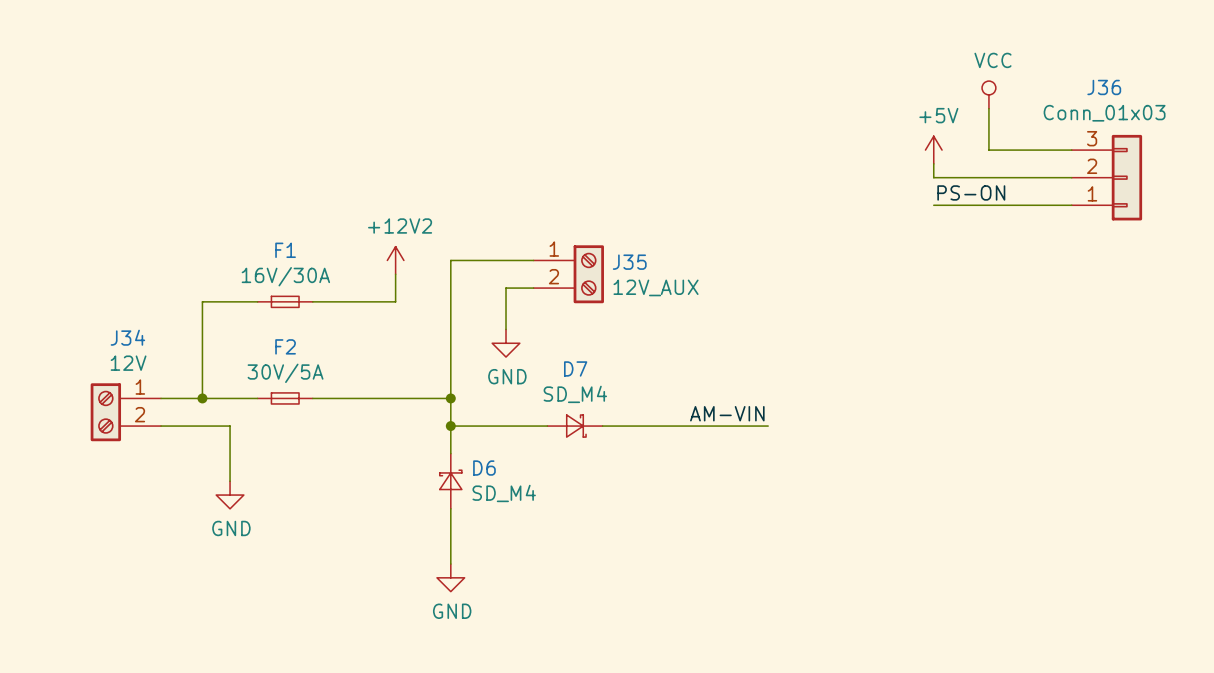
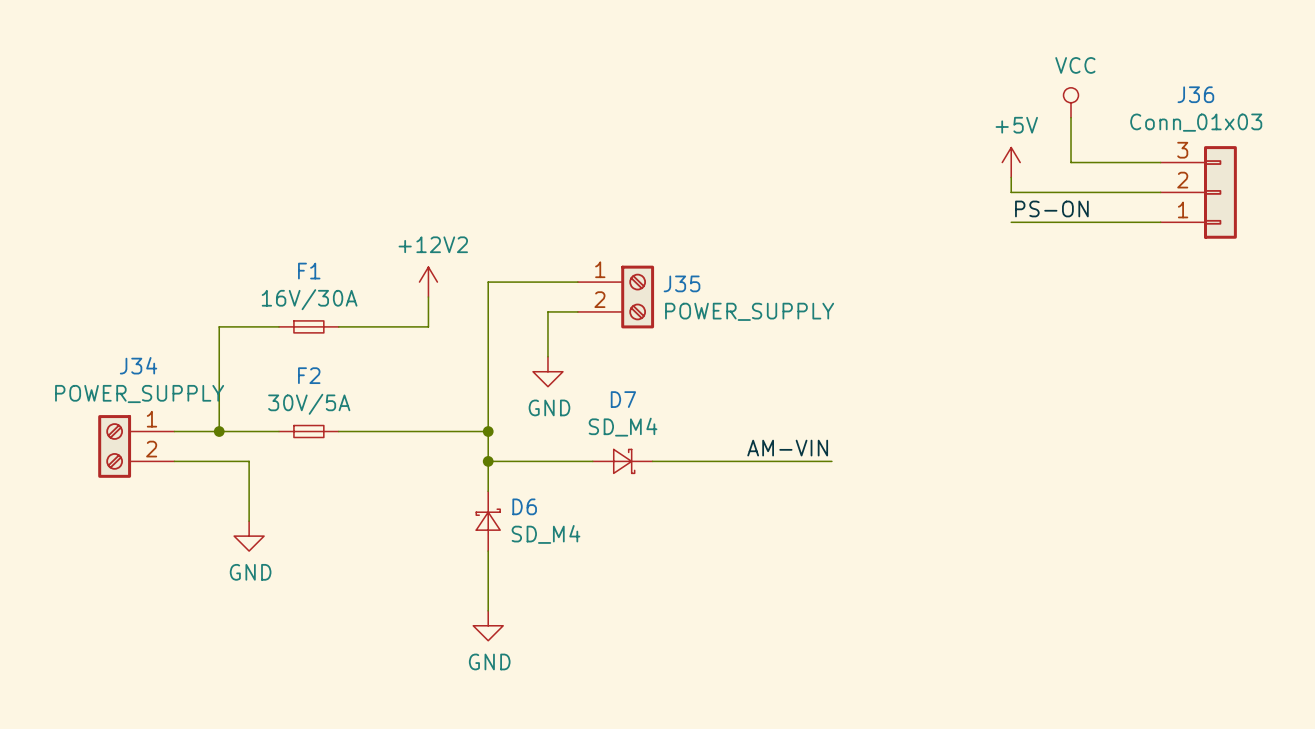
J35 value: 12V_AUX (656, 287) -> POWER_SUPPLY (749, 311)
J34 value: 12V (128, 363) -> POWER_SUPPLY (139, 394)

